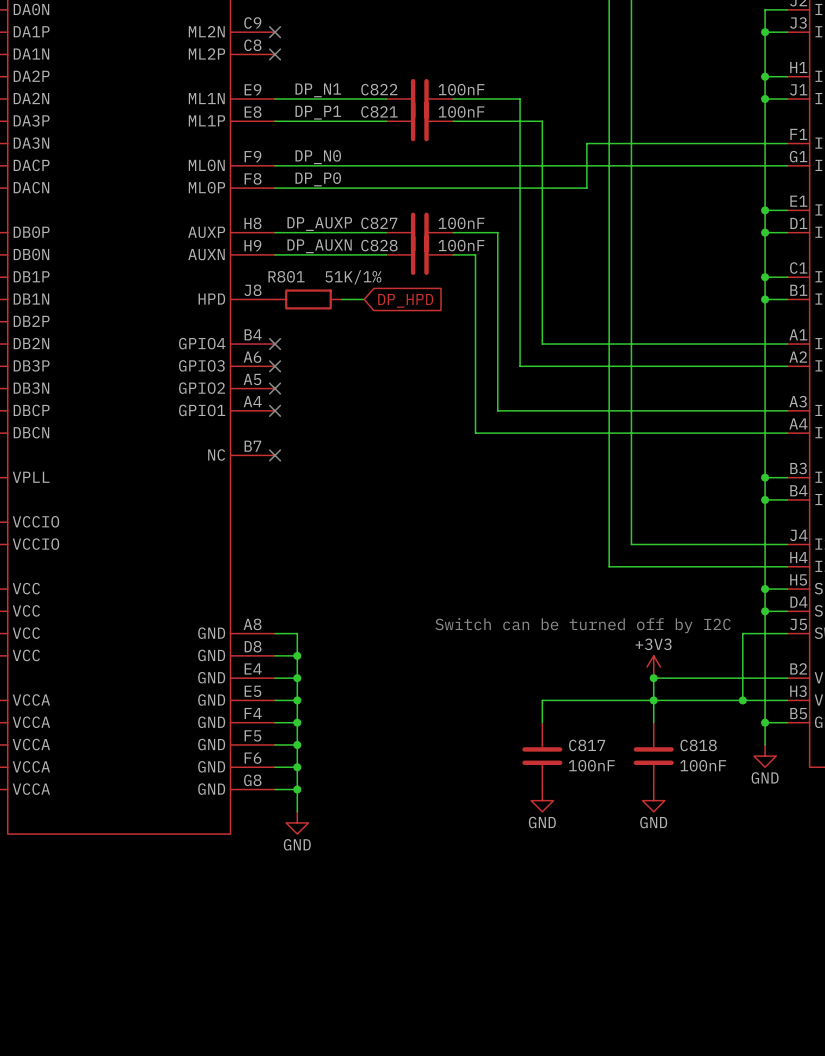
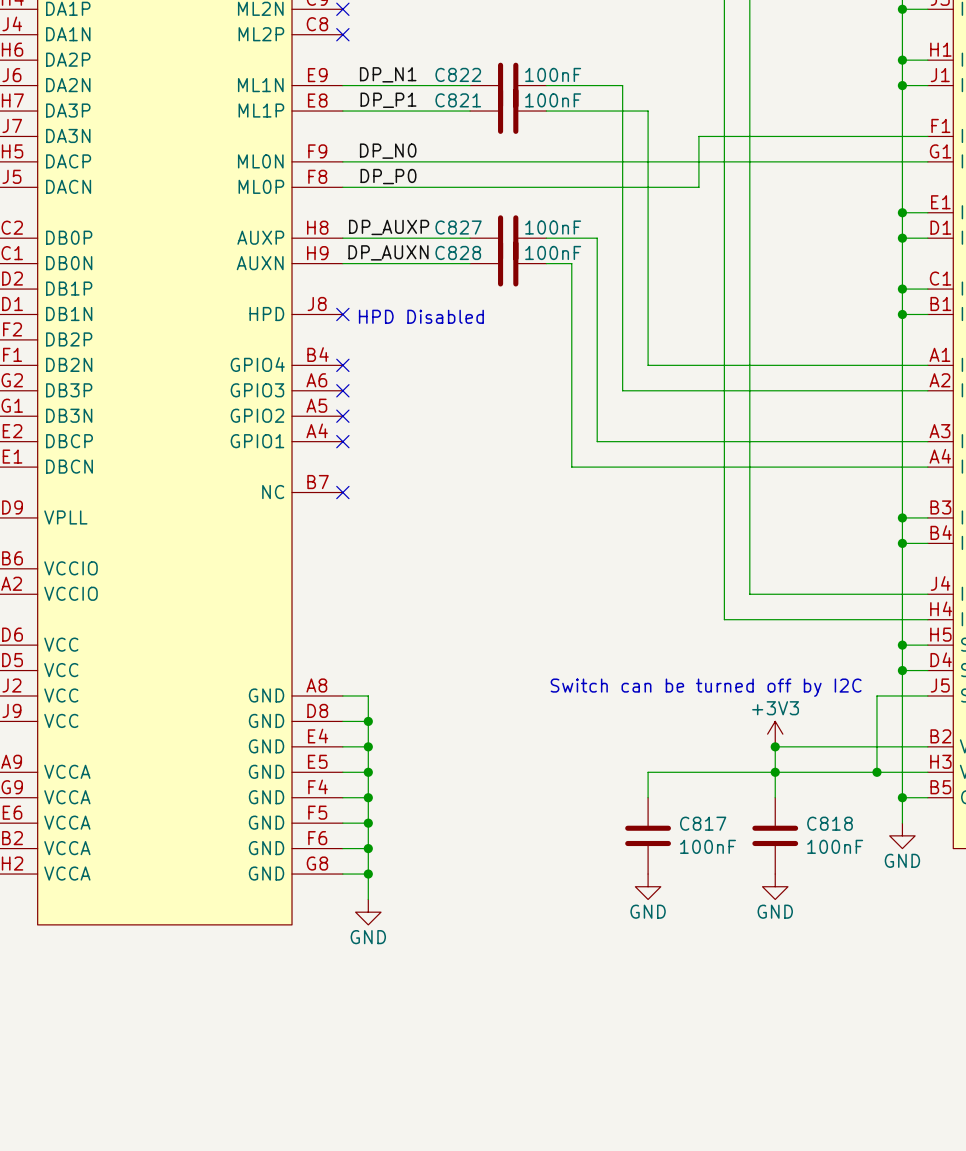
no-connect mark: none -> (342, 314)
R801: 51K/1% (308, 299) -> none
wire: (341, 299) (364, 299) -> none
global label: DP_HPD (405, 300) -> none
text: none -> HPD Disabled (421, 316)

